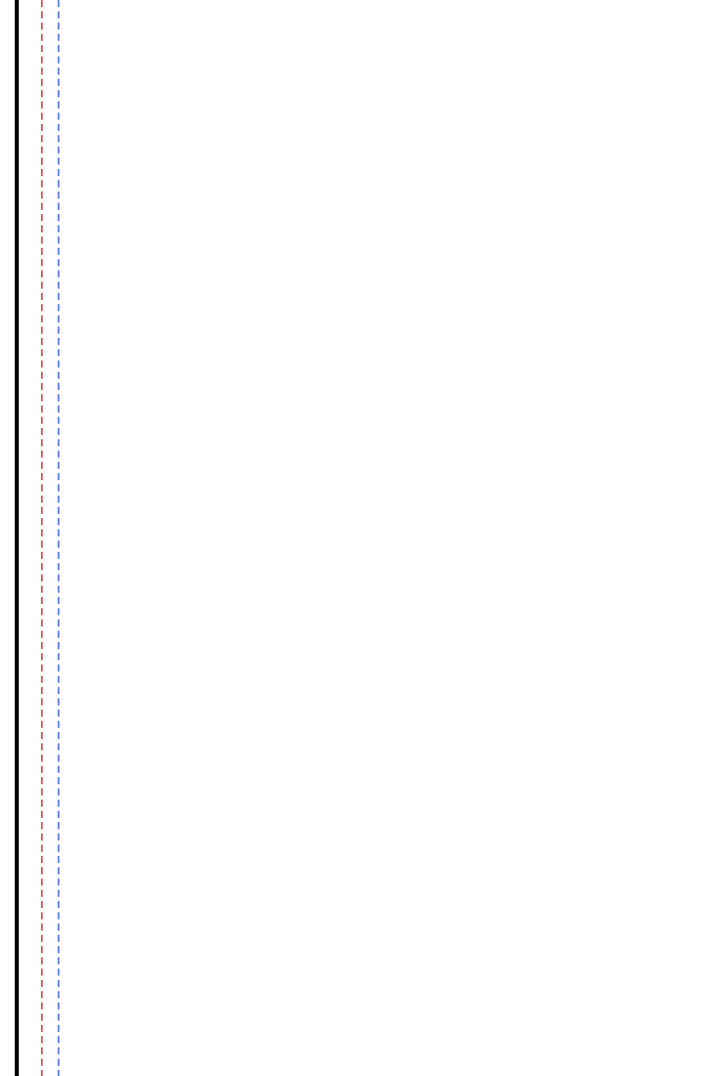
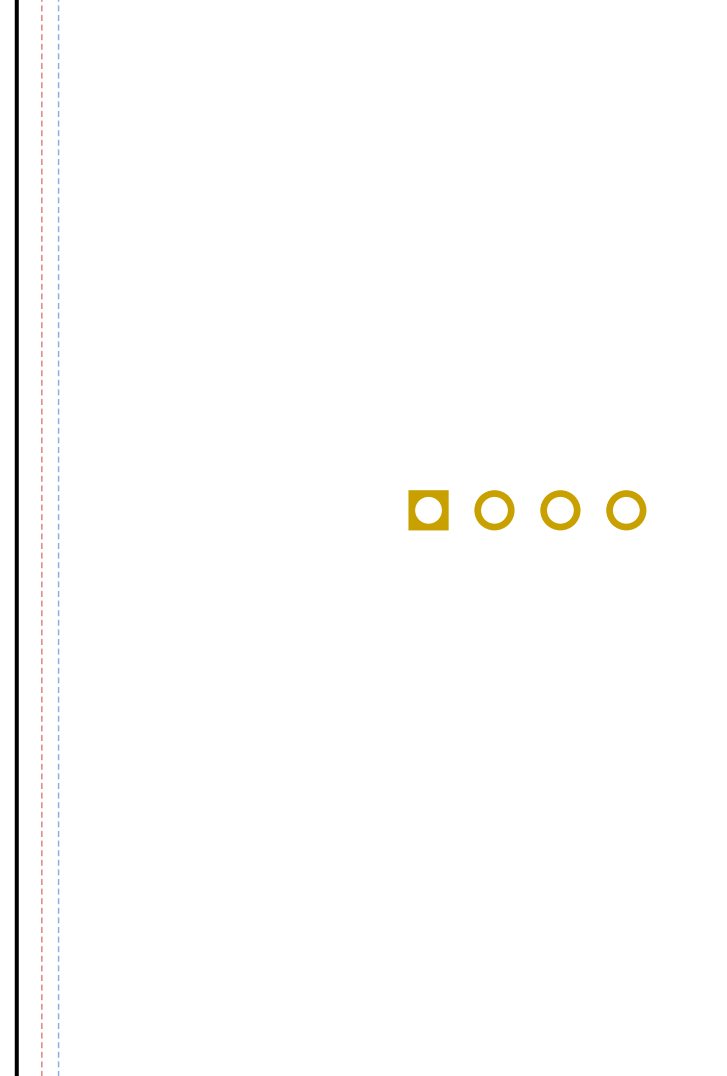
part: none -> (527, 510)

